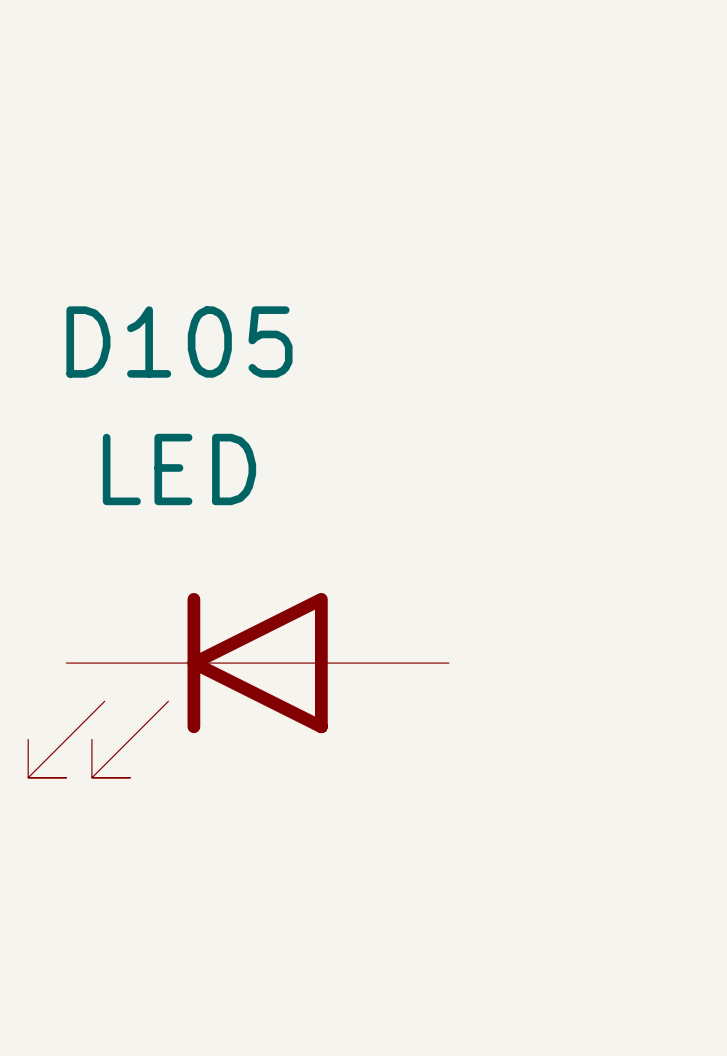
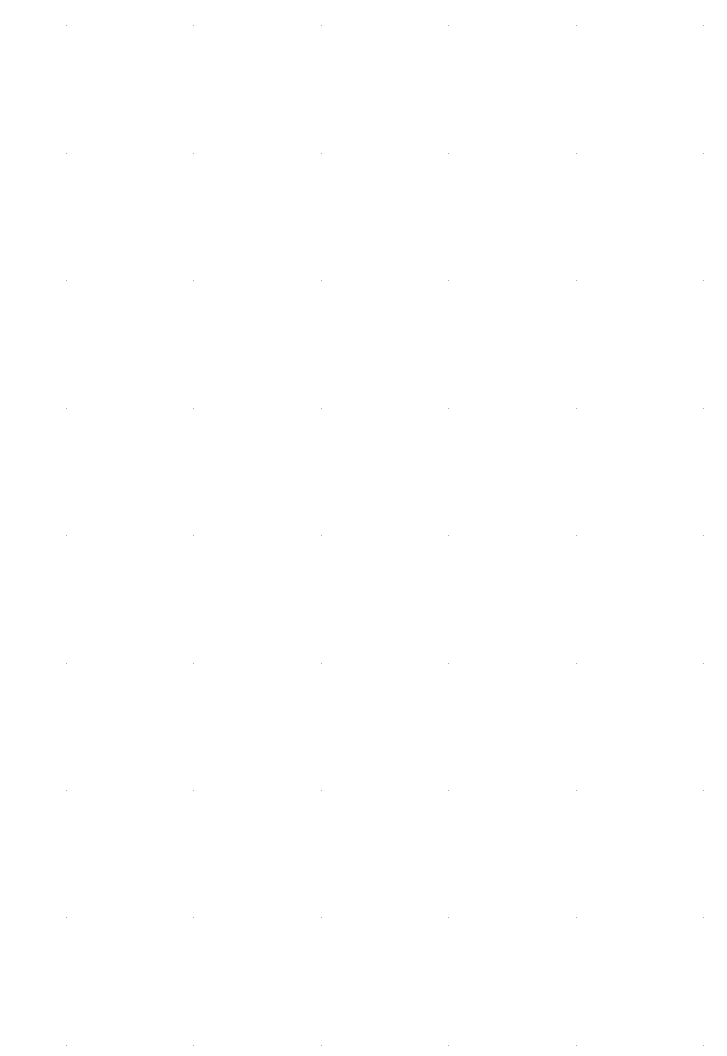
D105: LED (238, 685) -> none

